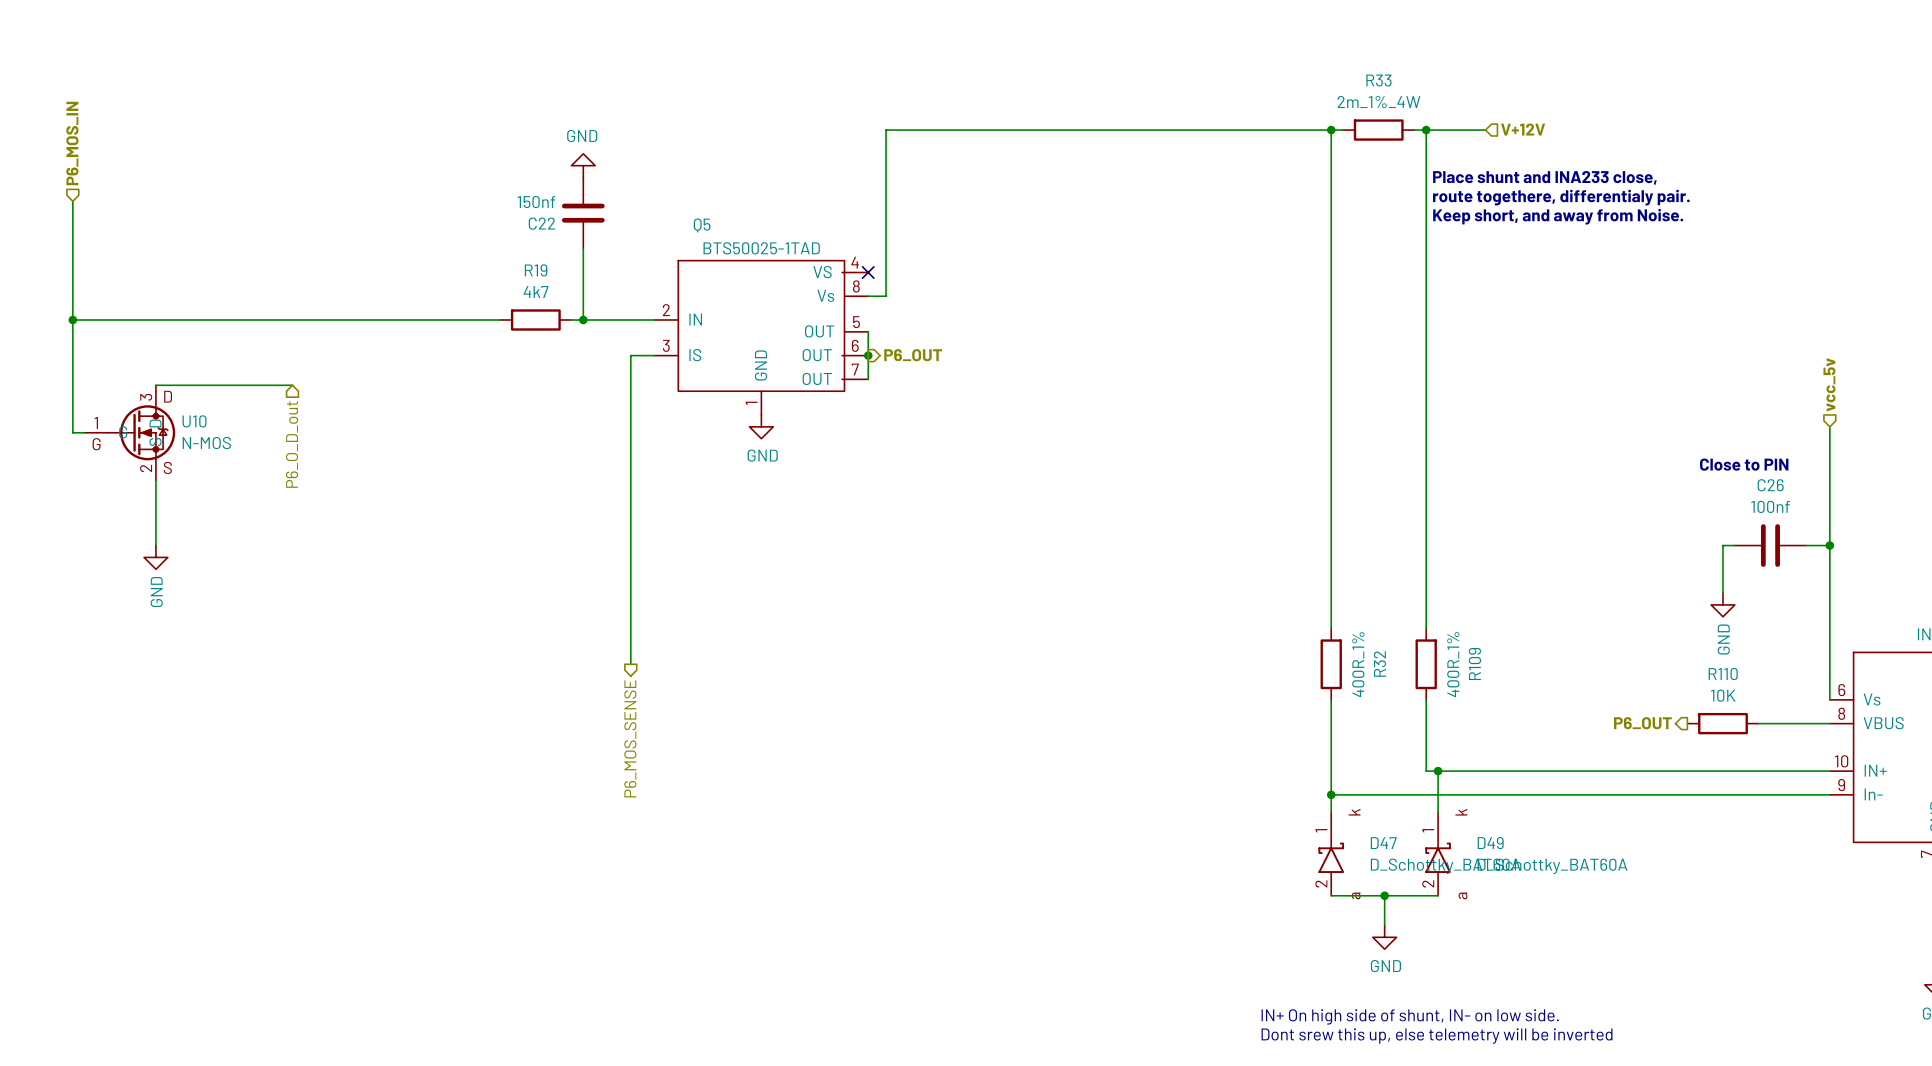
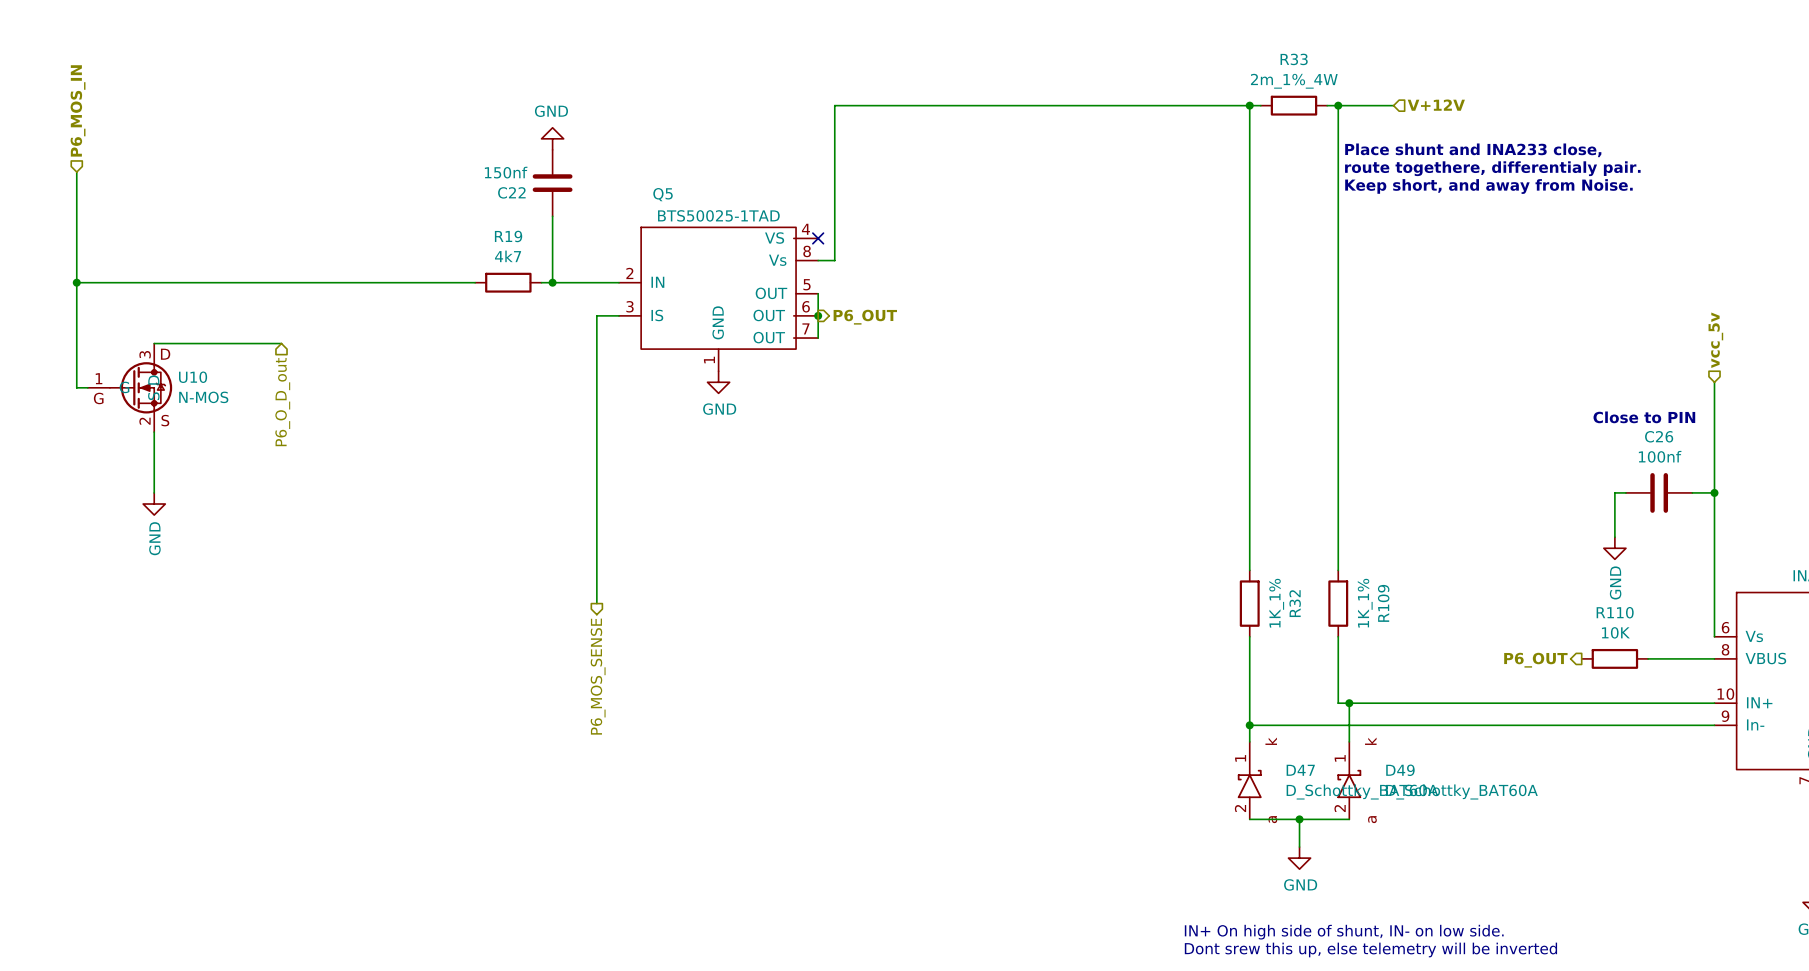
R32 value: 400R_1% (1358, 664) -> 1K_1% (1276, 603)
R109 value: 400R_1% (1453, 664) -> 1K_1% (1365, 603)

